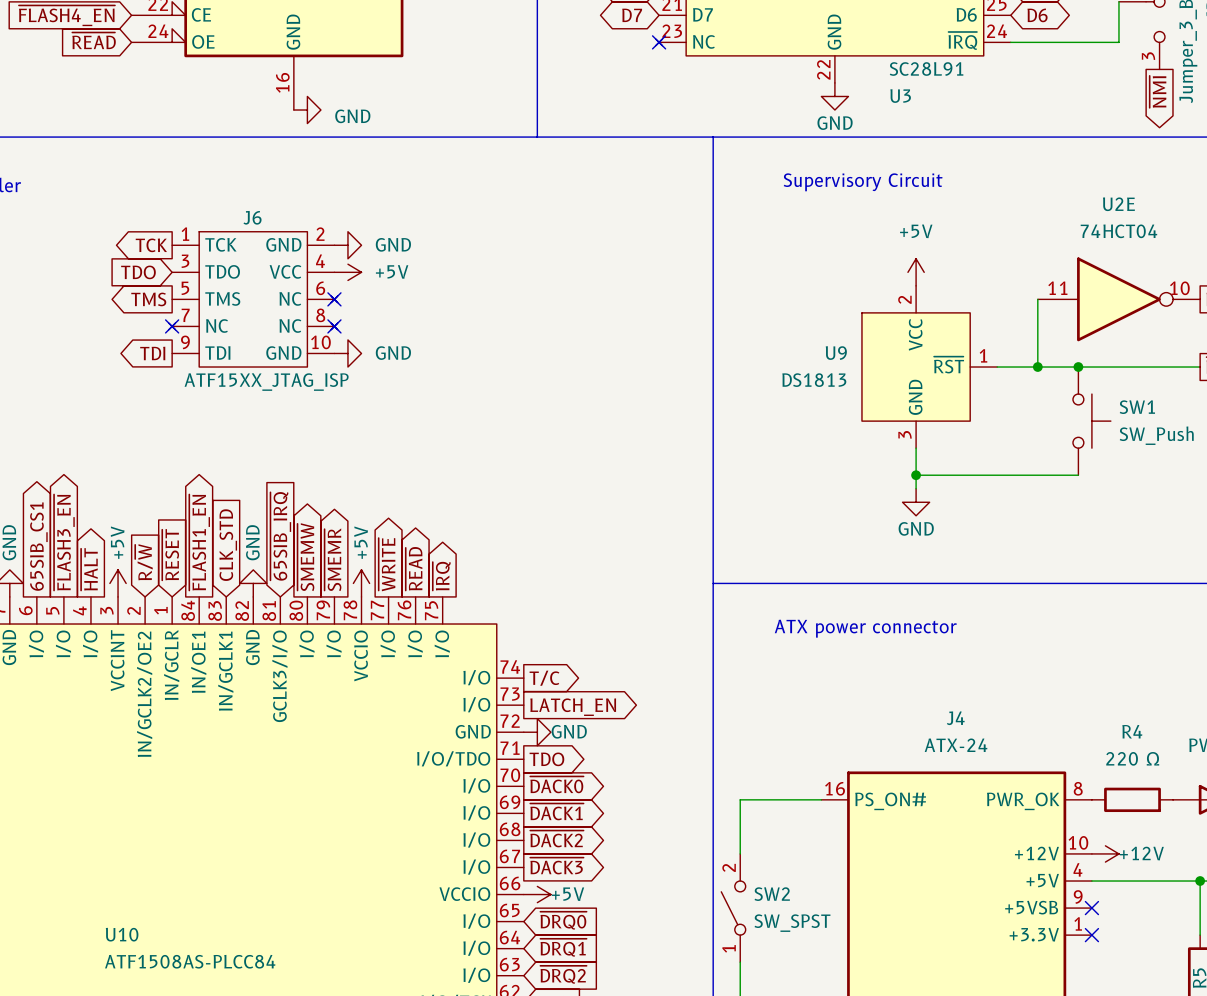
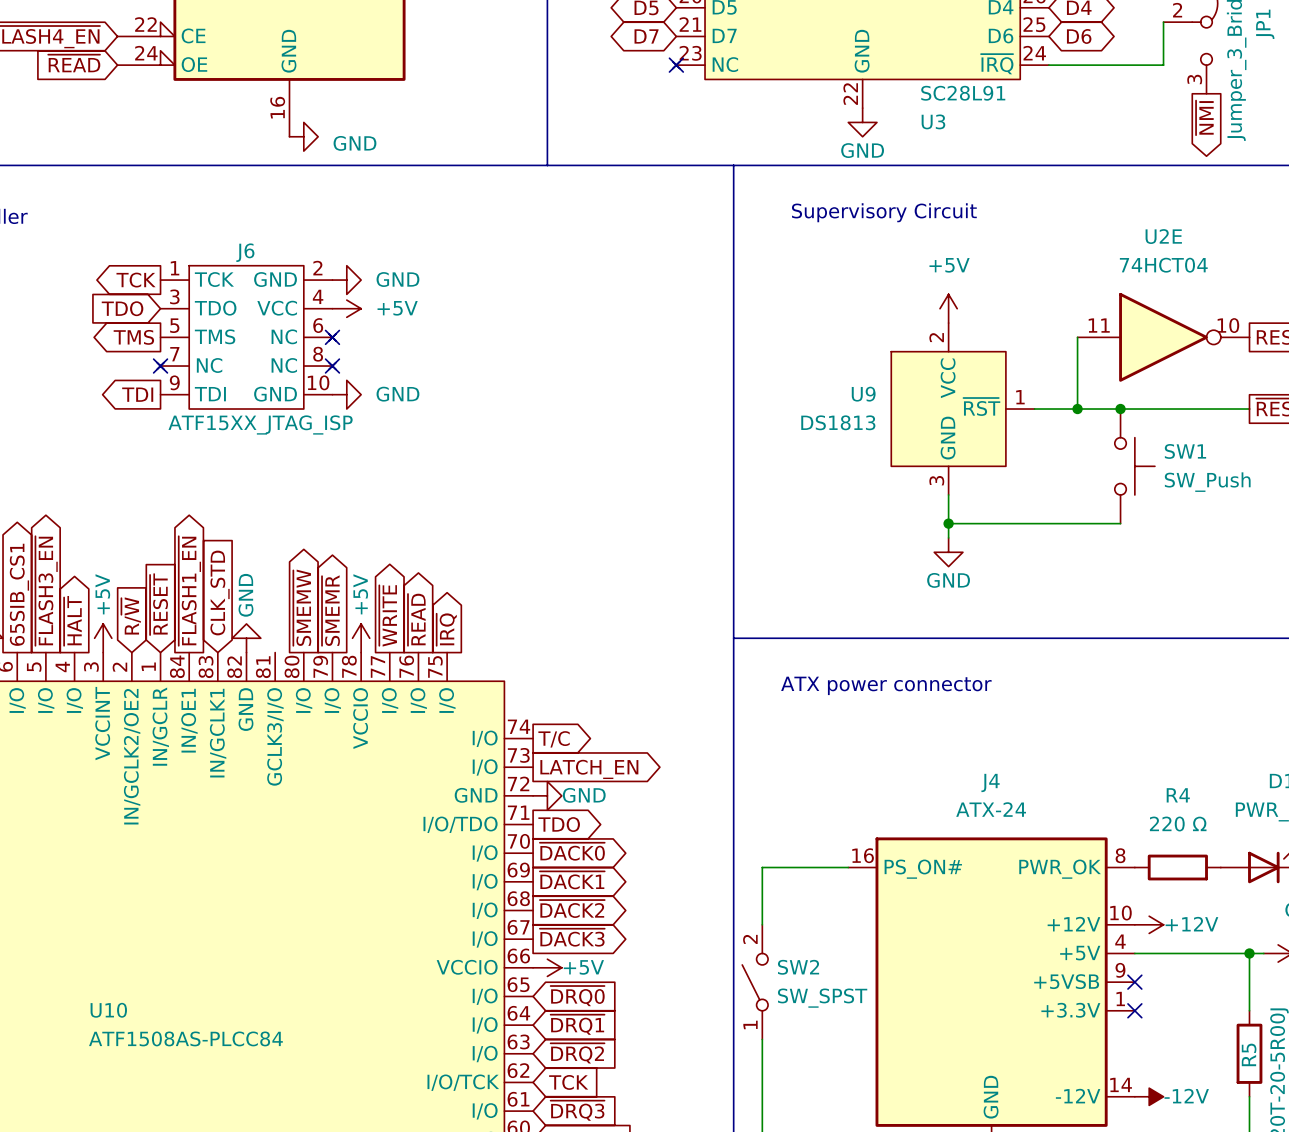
global label: ~{65SIB_IRQ} (280, 536) -> none

